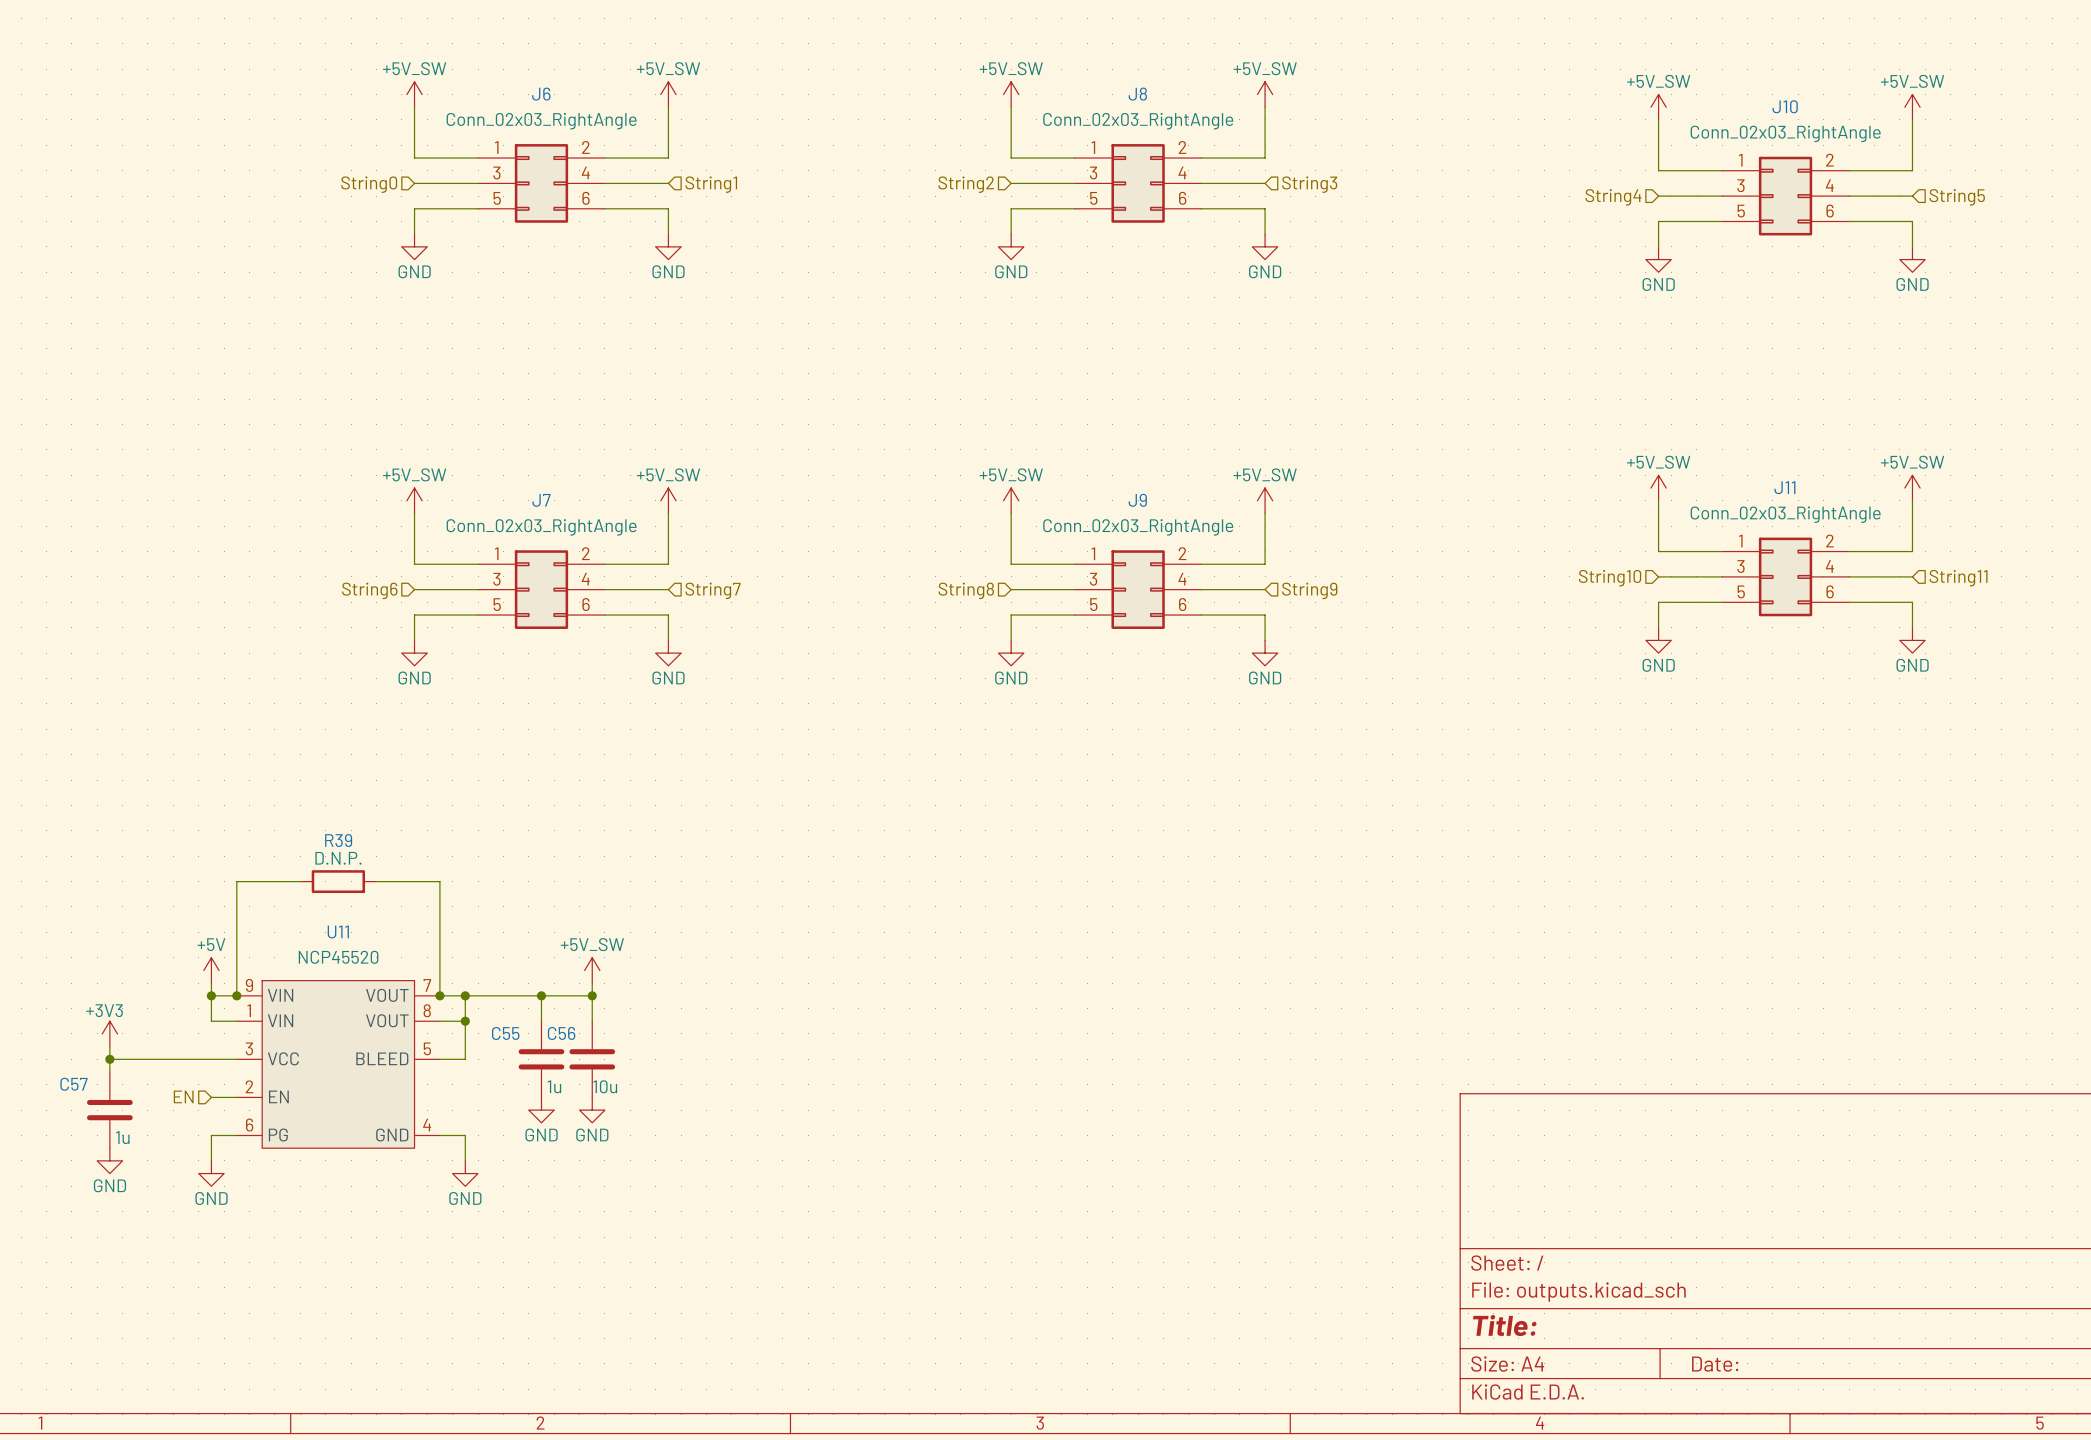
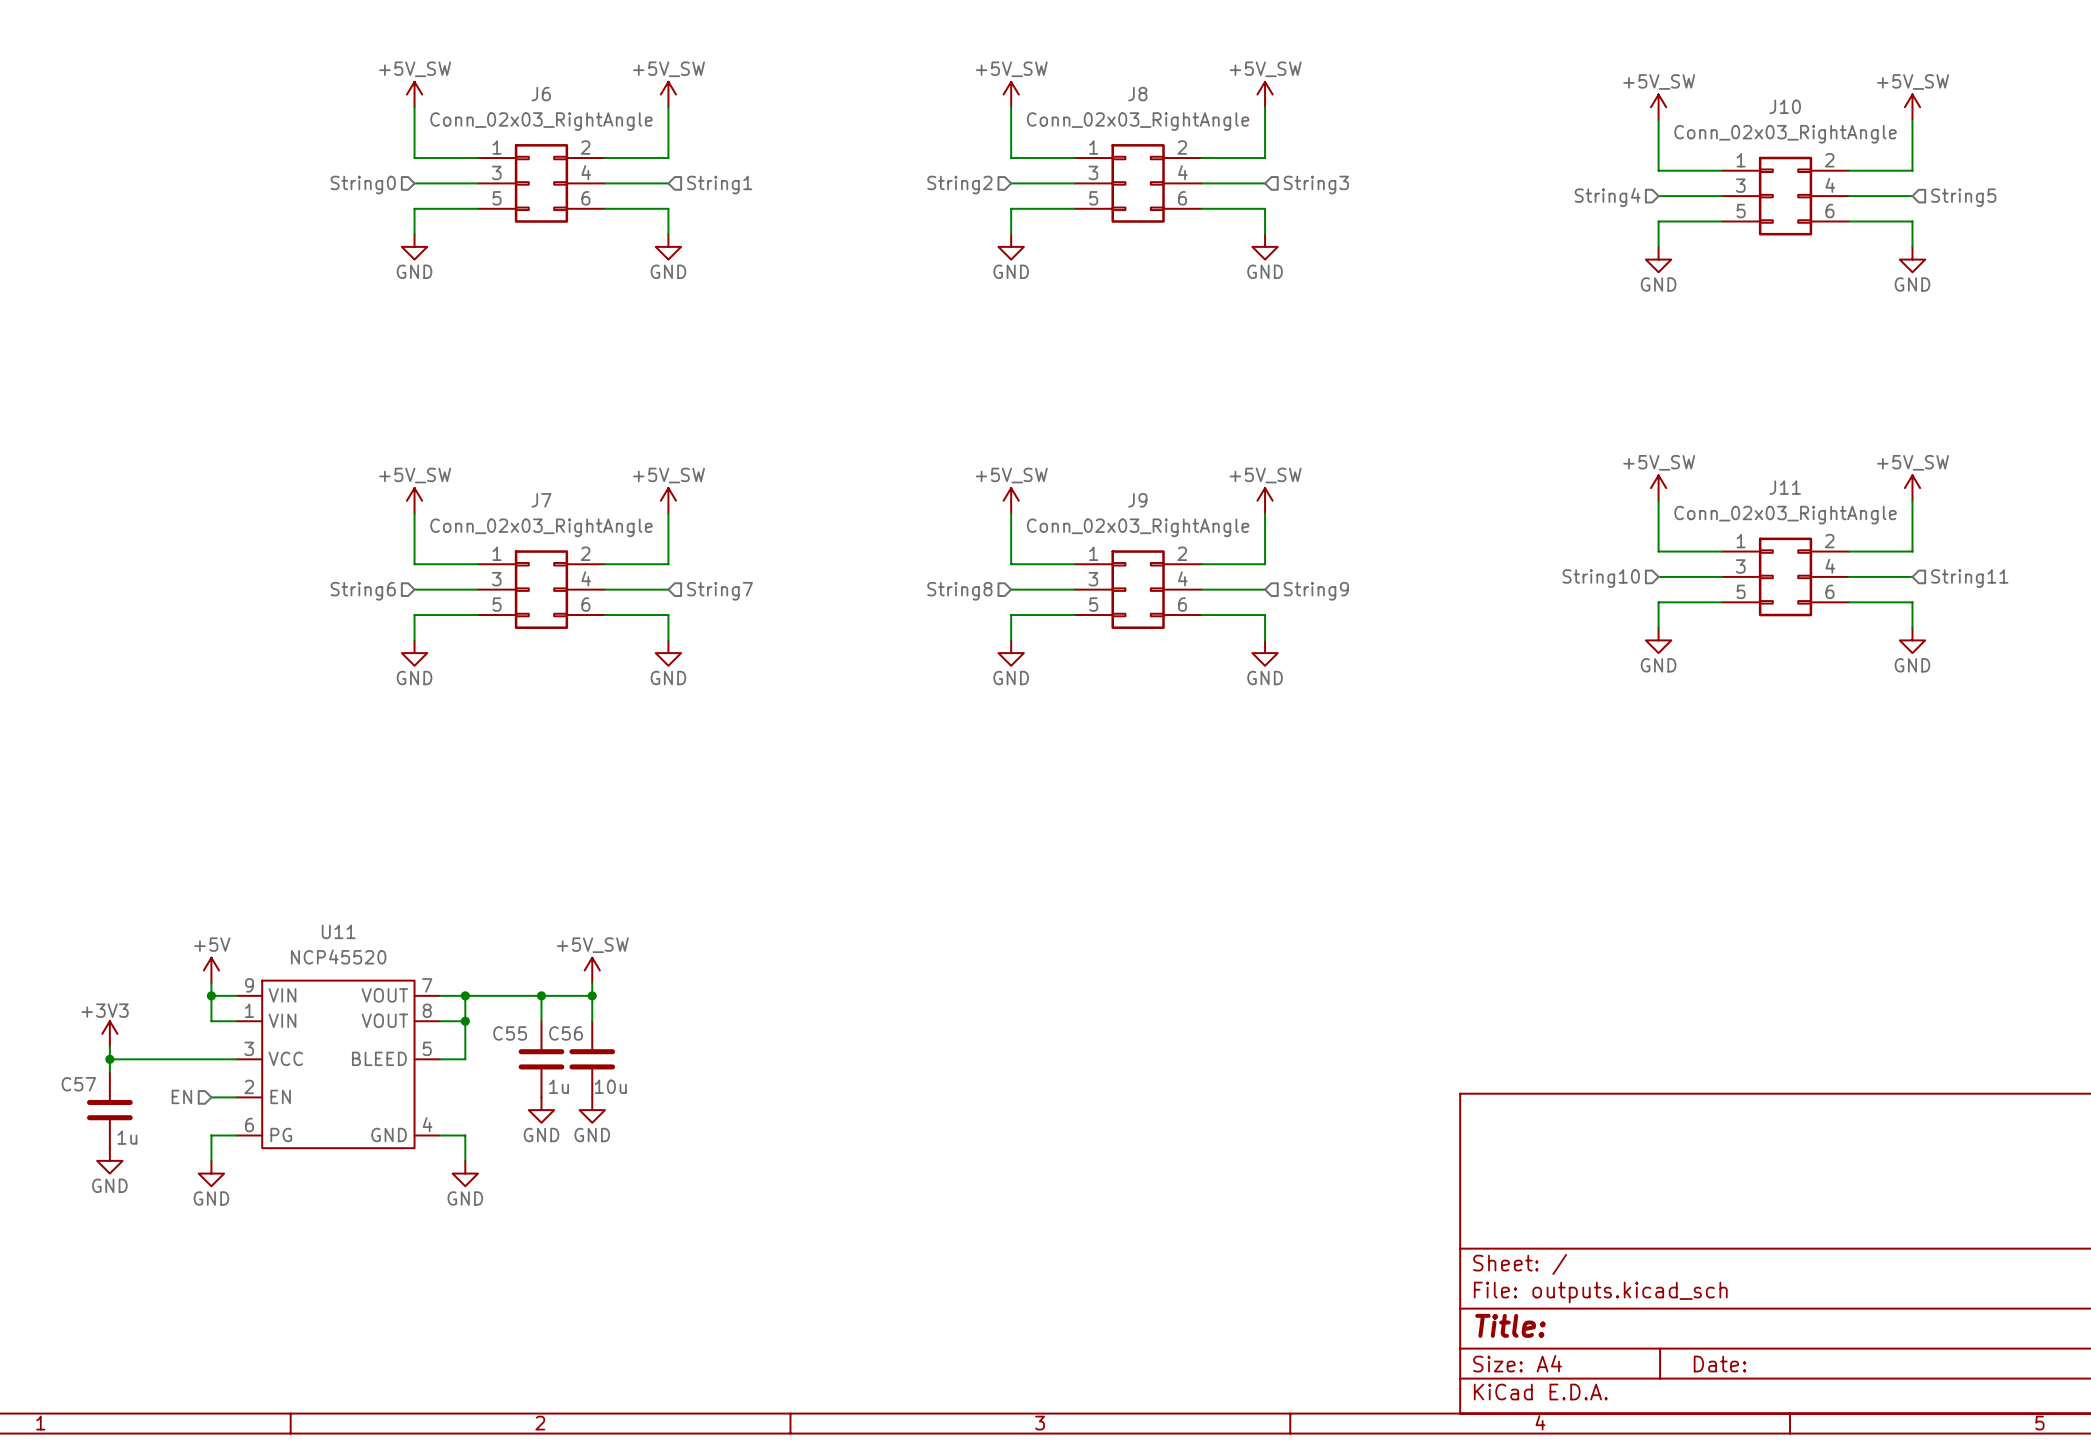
wire: (300, 881) (236, 881) (236, 995) -> none
R39: D.N.P. (338, 881) -> none
wire: (376, 881) (439, 881) (439, 995) -> none
junction: (236, 995) -> none
junction: (439, 995) -> none

